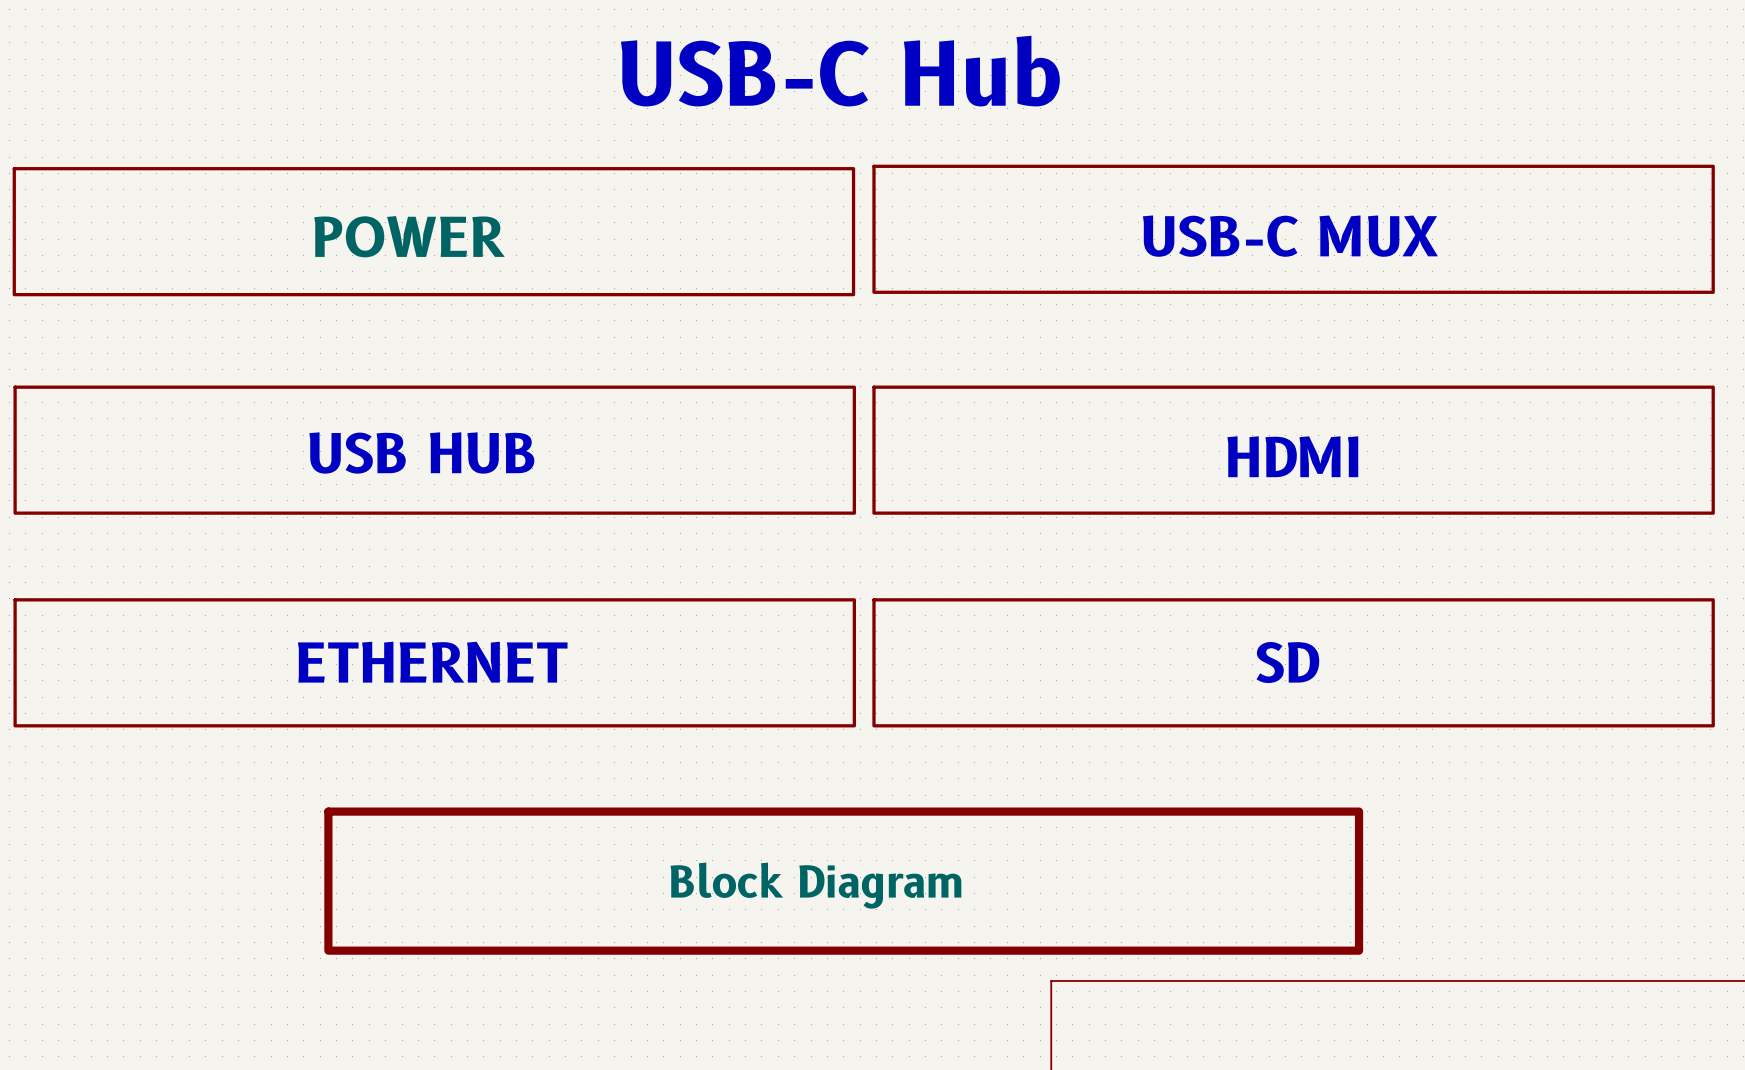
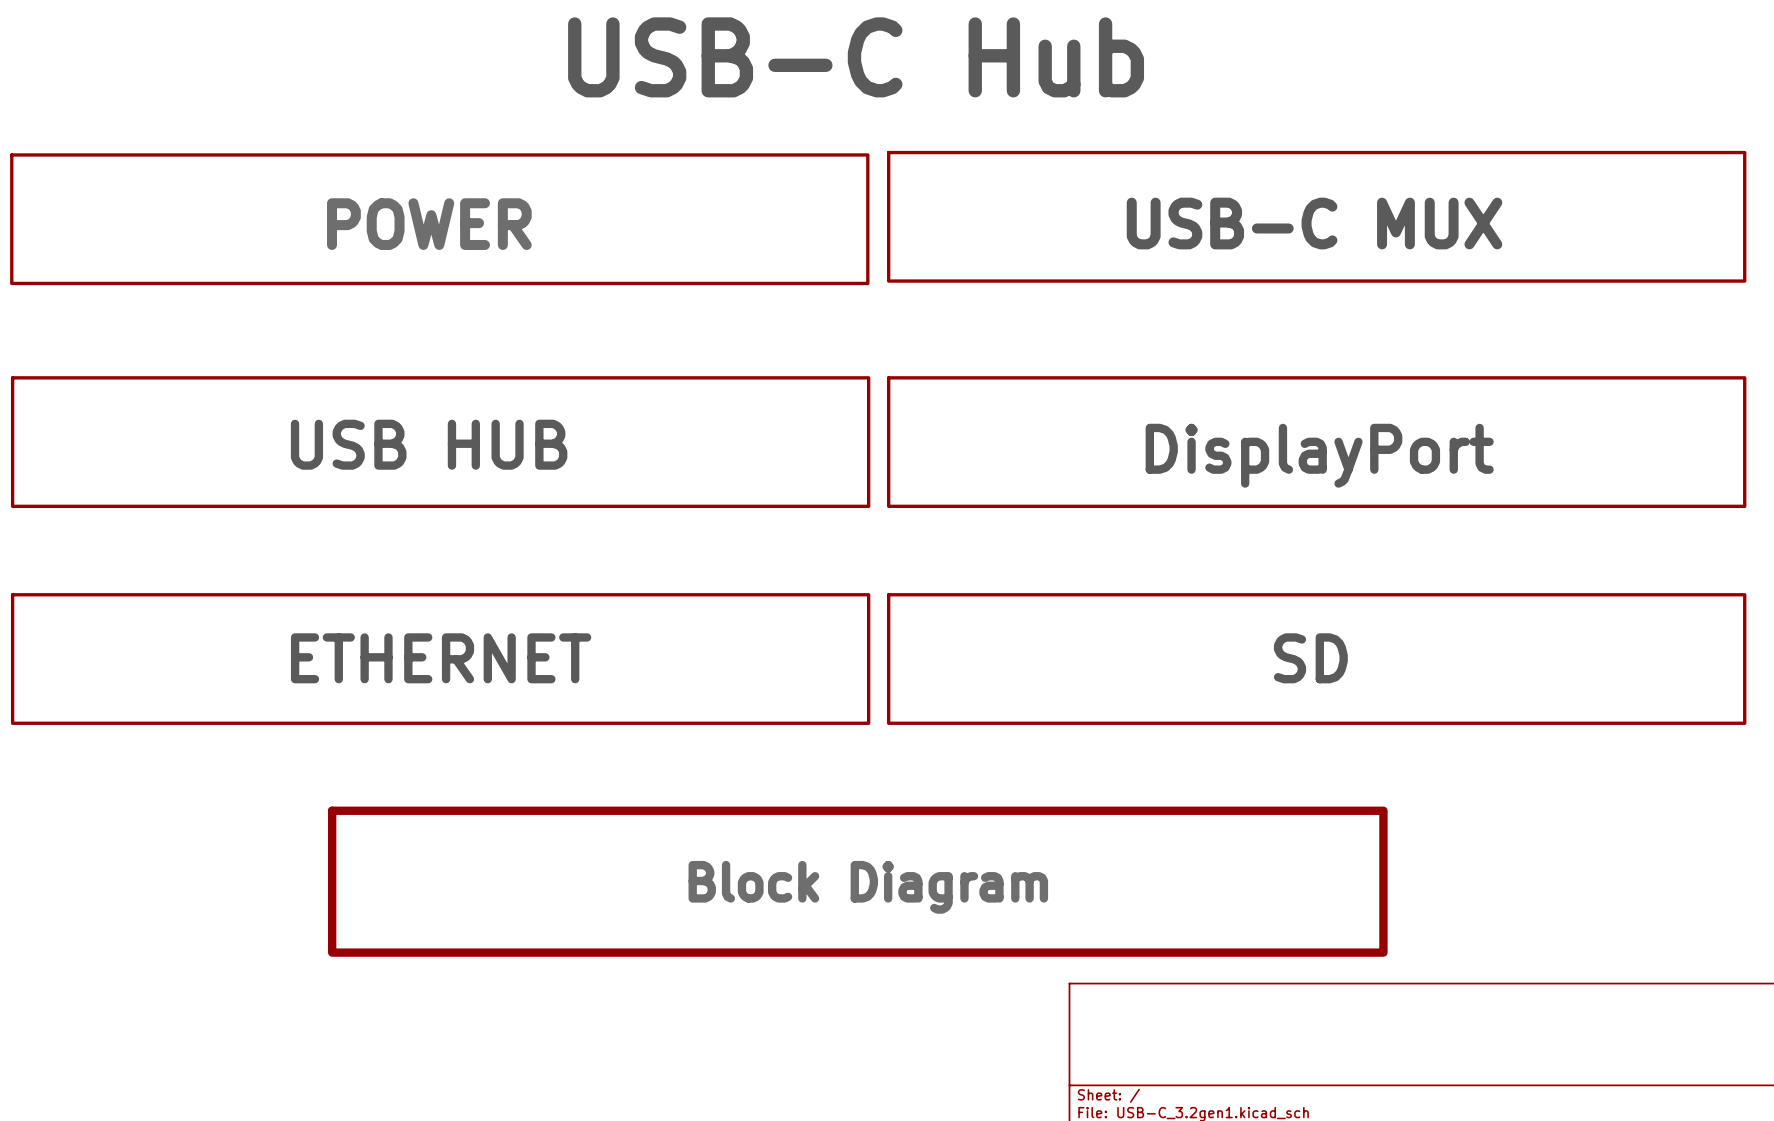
text: HDMI (1292, 456) -> DisplayPort (1319, 455)

